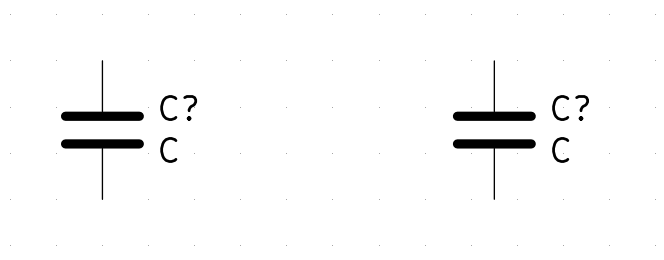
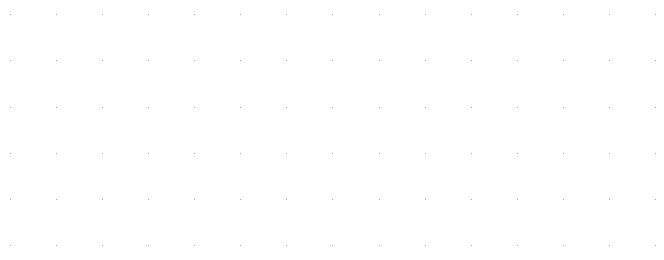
C?: C (102, 130) -> none
C?: C (494, 130) -> none

